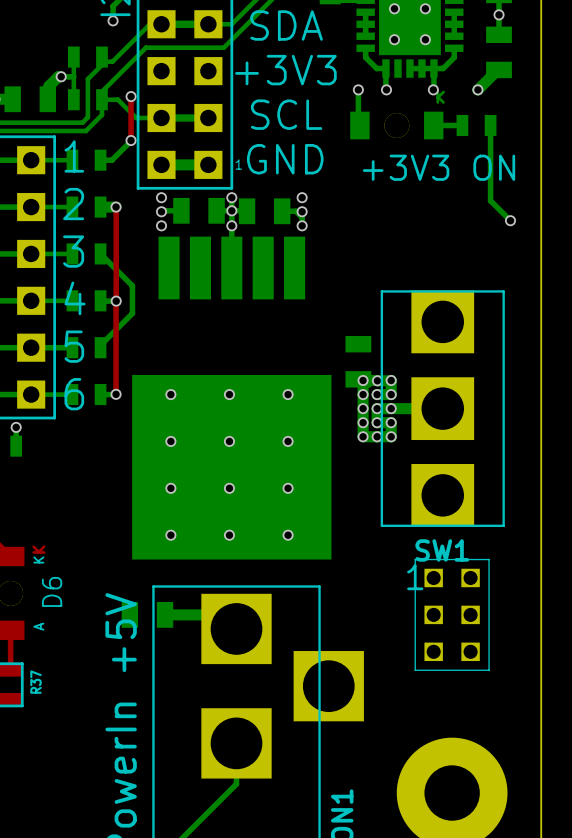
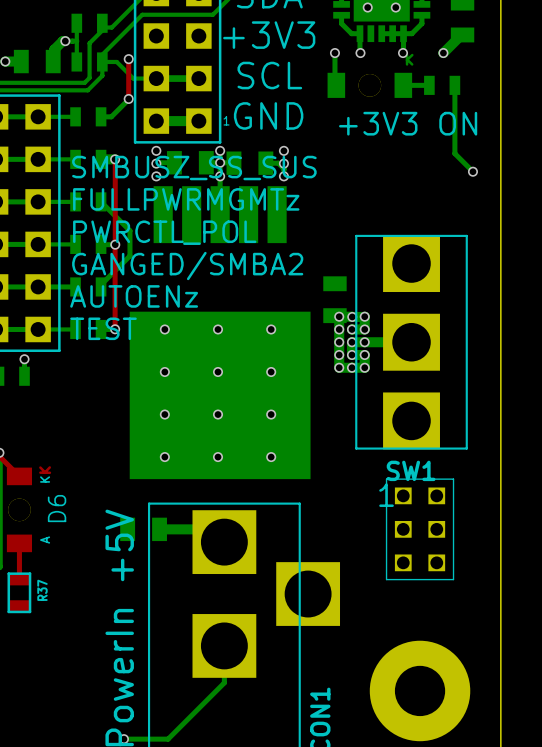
text: 1 (74, 156) -> none
text: 2 (73, 204) -> SMBUSZ_SS_SUS (194, 168)
text: 3 (73, 251) -> FULLPWRMGMTz (186, 199)
text: none -> PWRCTL_POL (164, 232)
text: 4 (75, 298) -> none
text: none -> GANGED/SMBA2 (187, 266)
text: 5 (74, 346) -> none
text: none -> AUTOENz (134, 296)
text: 6 (74, 394) -> TEST (103, 328)

